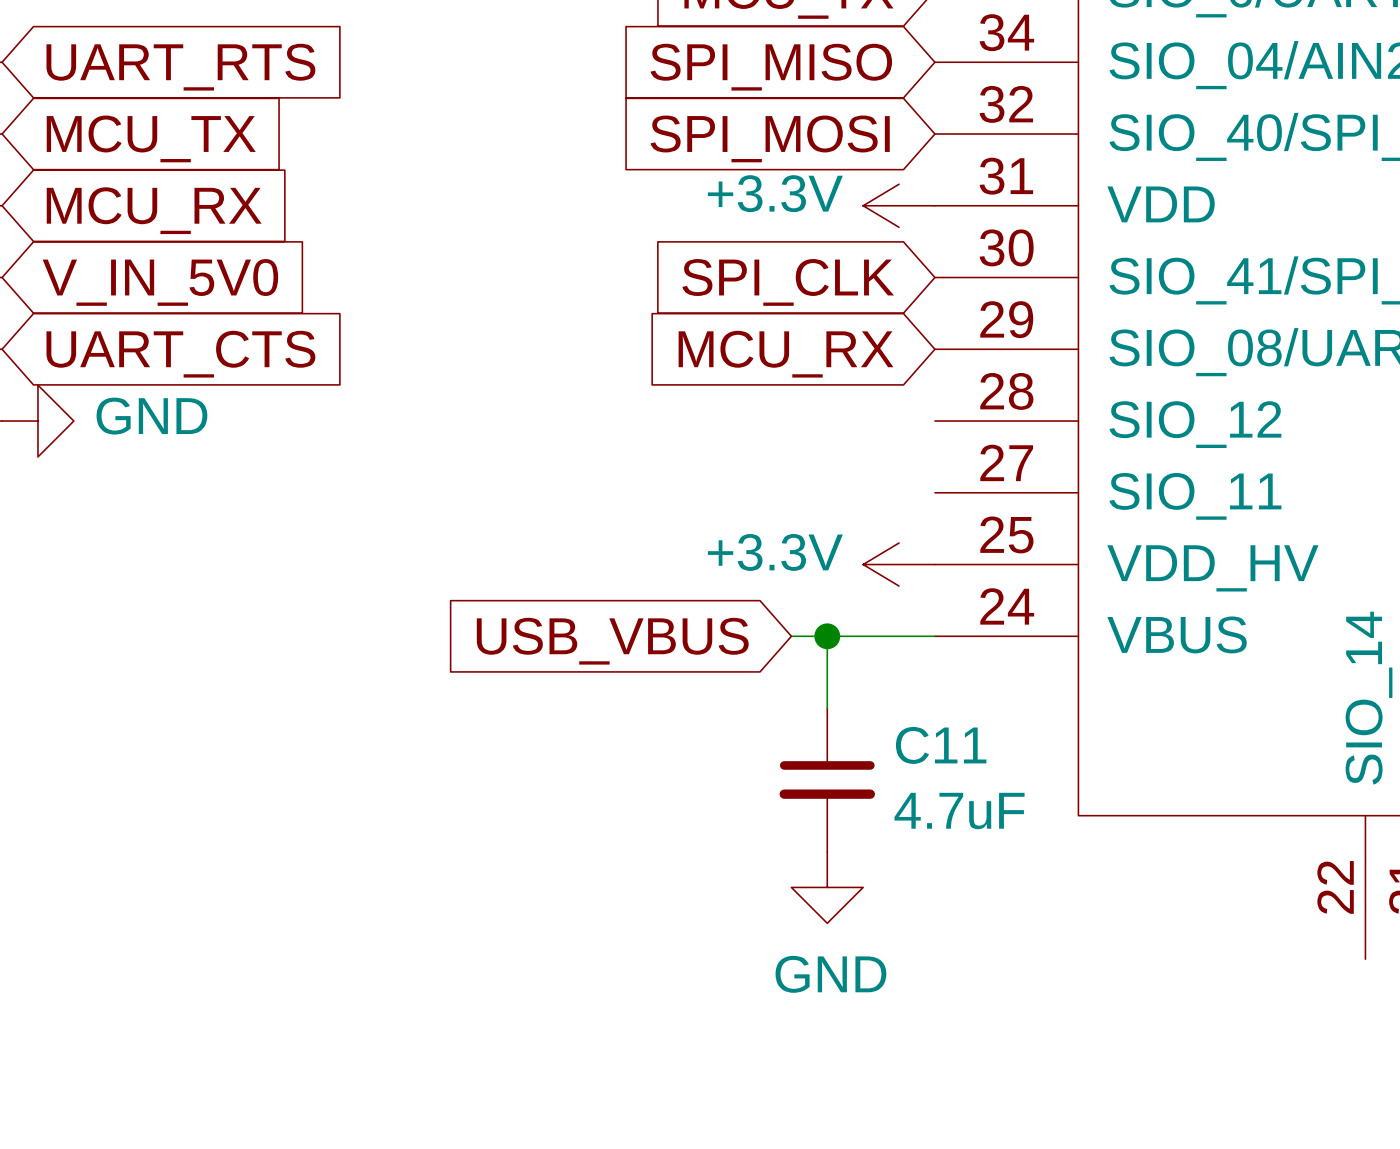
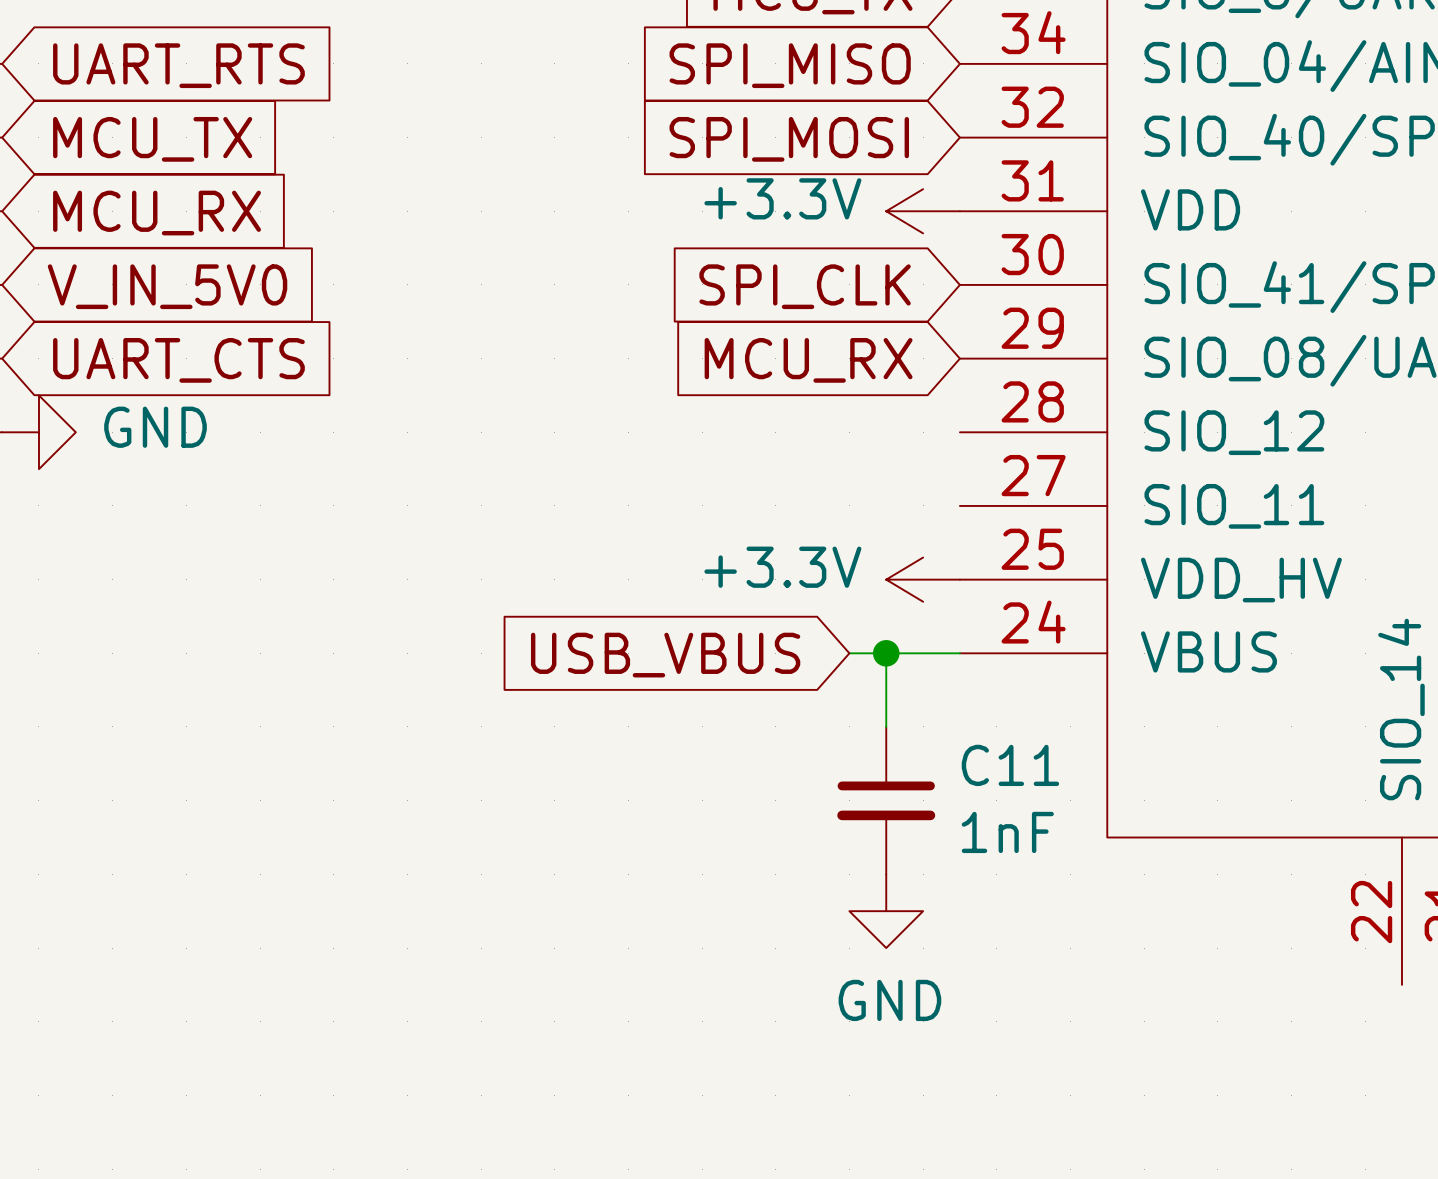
wire: (791, 636) (827, 636) (827, 708) -> none
junction position: (827, 636) -> (886, 653)
wire: none -> (886, 653) (886, 726)
global label position: USB_VBUS (612, 641) -> USB_VBUS (665, 655)
C11 position: (827, 779) -> (886, 800)
C11 value: 4.7uF (959, 811) -> 1nF (1007, 832)
power symbol position: GND (827, 887) -> GND (886, 911)

